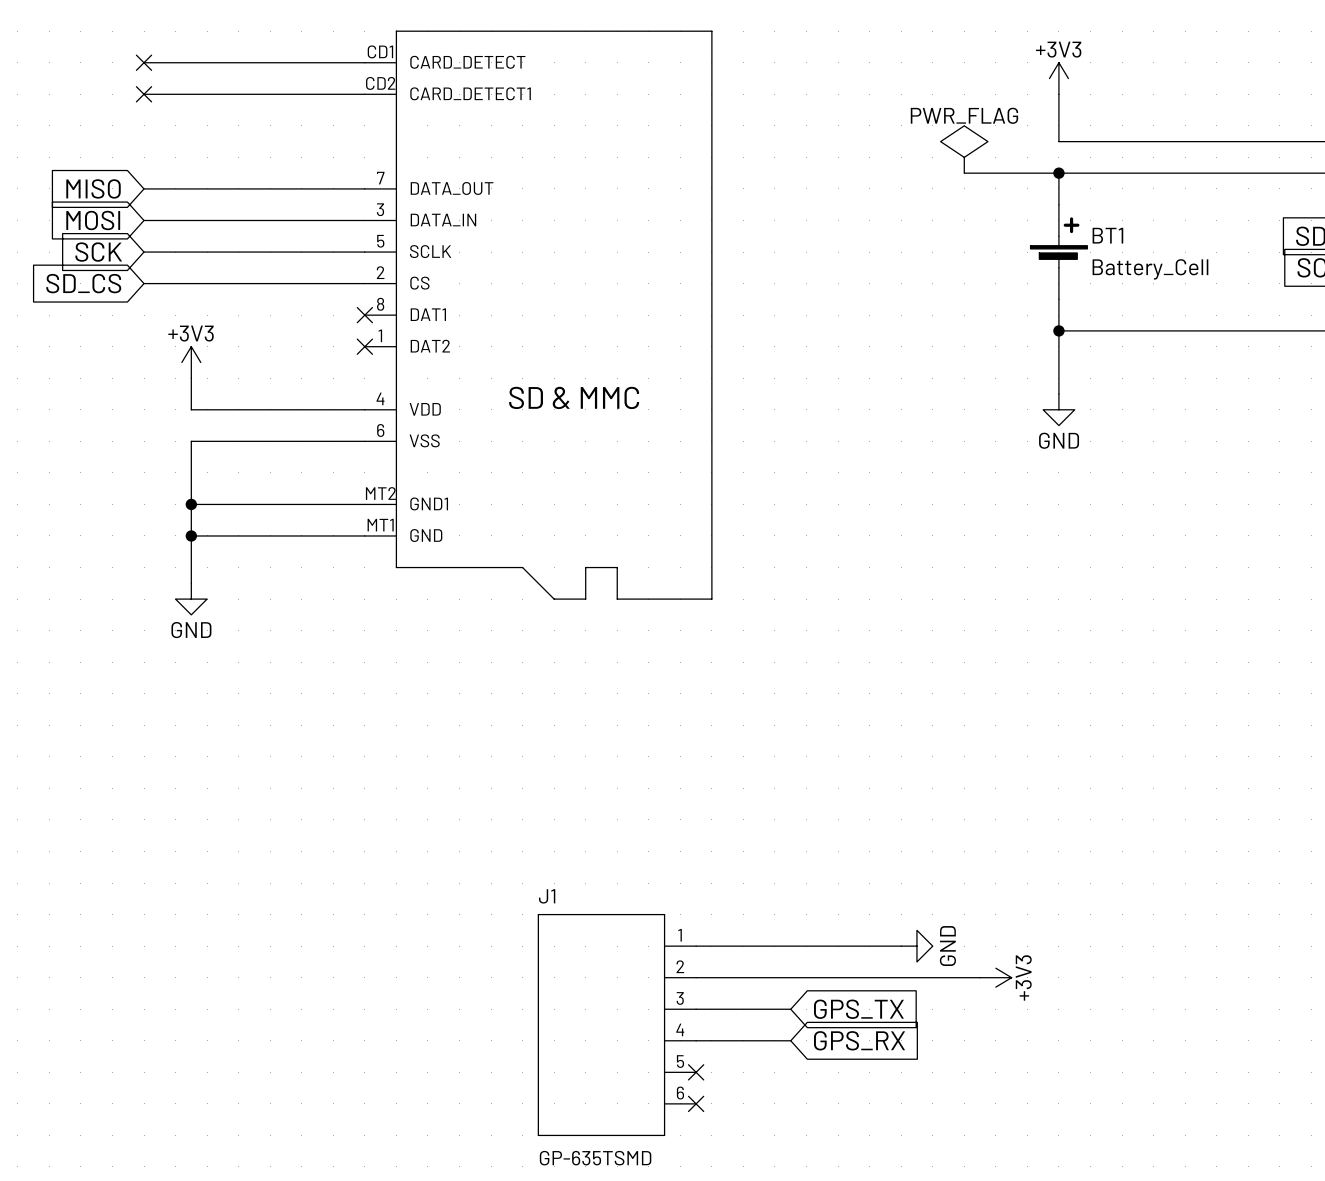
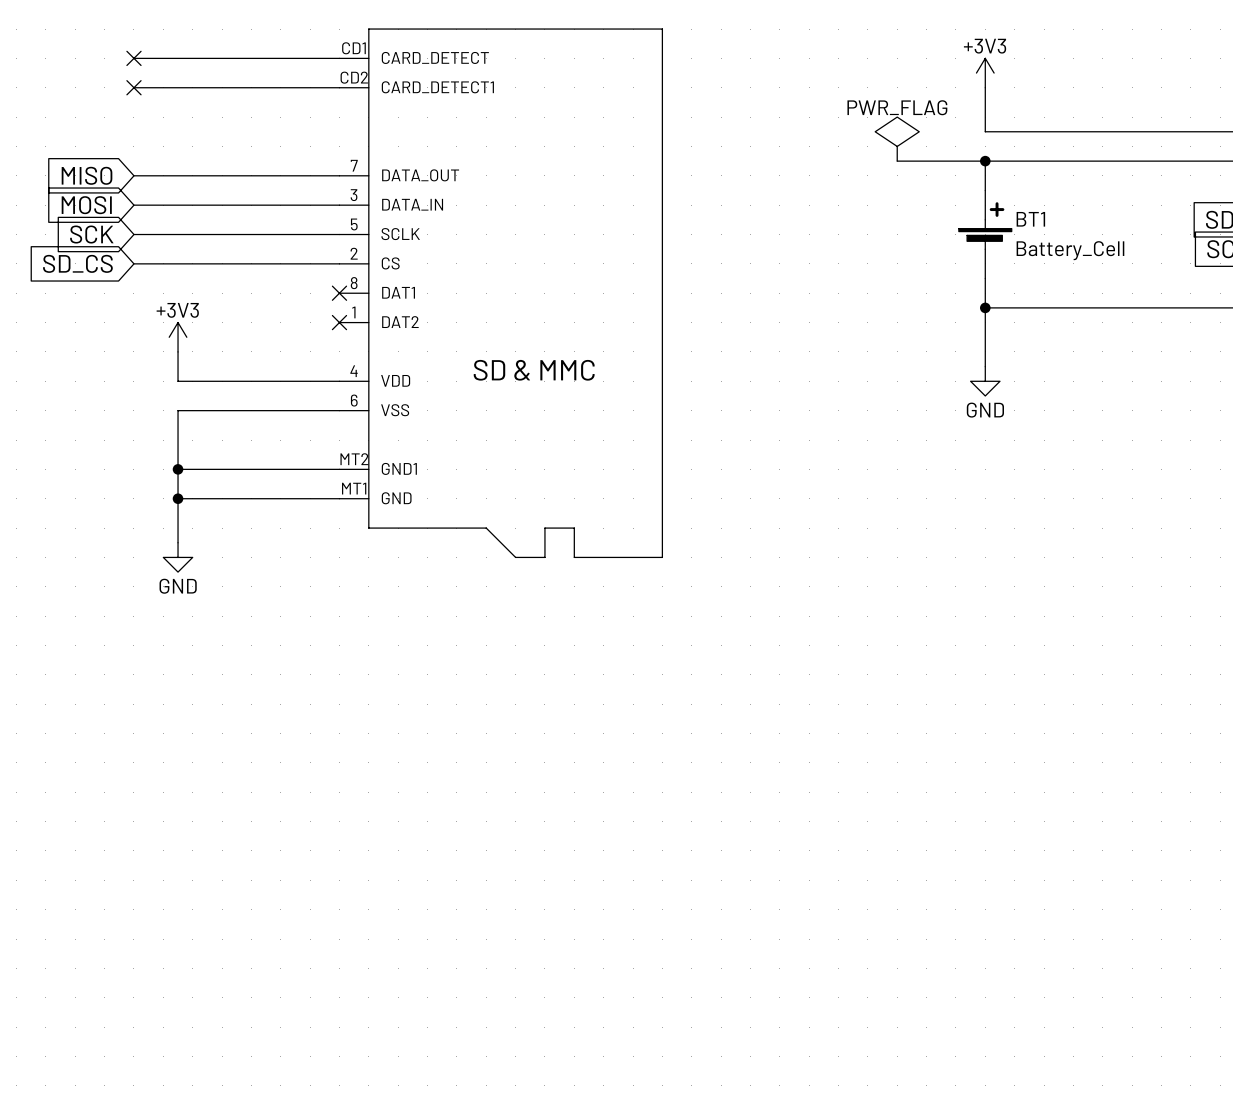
wire: (696, 946) (901, 946) -> none
power symbol: GND (916, 946) -> none
wire: (696, 977) (980, 977) -> none
power symbol: +3V3 (995, 977) -> none
wire: (696, 1009) (790, 1009) -> none
global label: GPS_TX (858, 1009) -> none
J1: GP-635TSMD (617, 1025) -> none
wire: (696, 1040) (790, 1040) -> none
global label: GPS_RX (859, 1040) -> none
no-connect mark: (696, 1072) -> none
no-connect mark: (696, 1103) -> none

